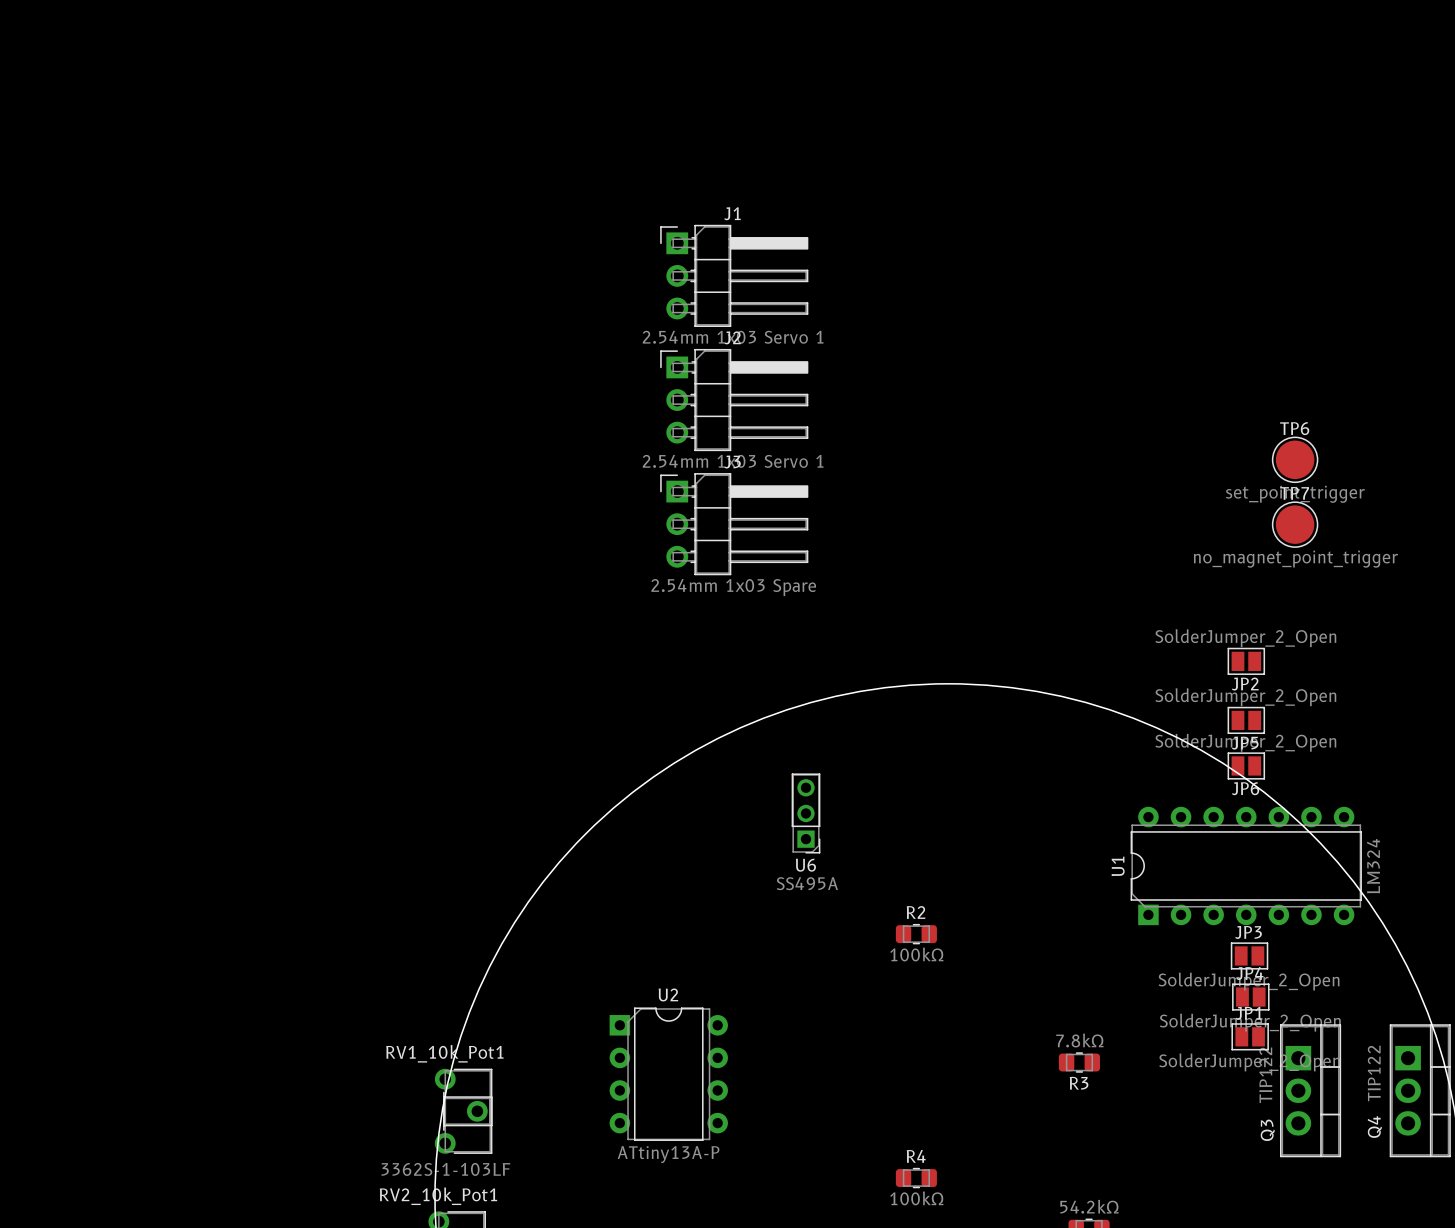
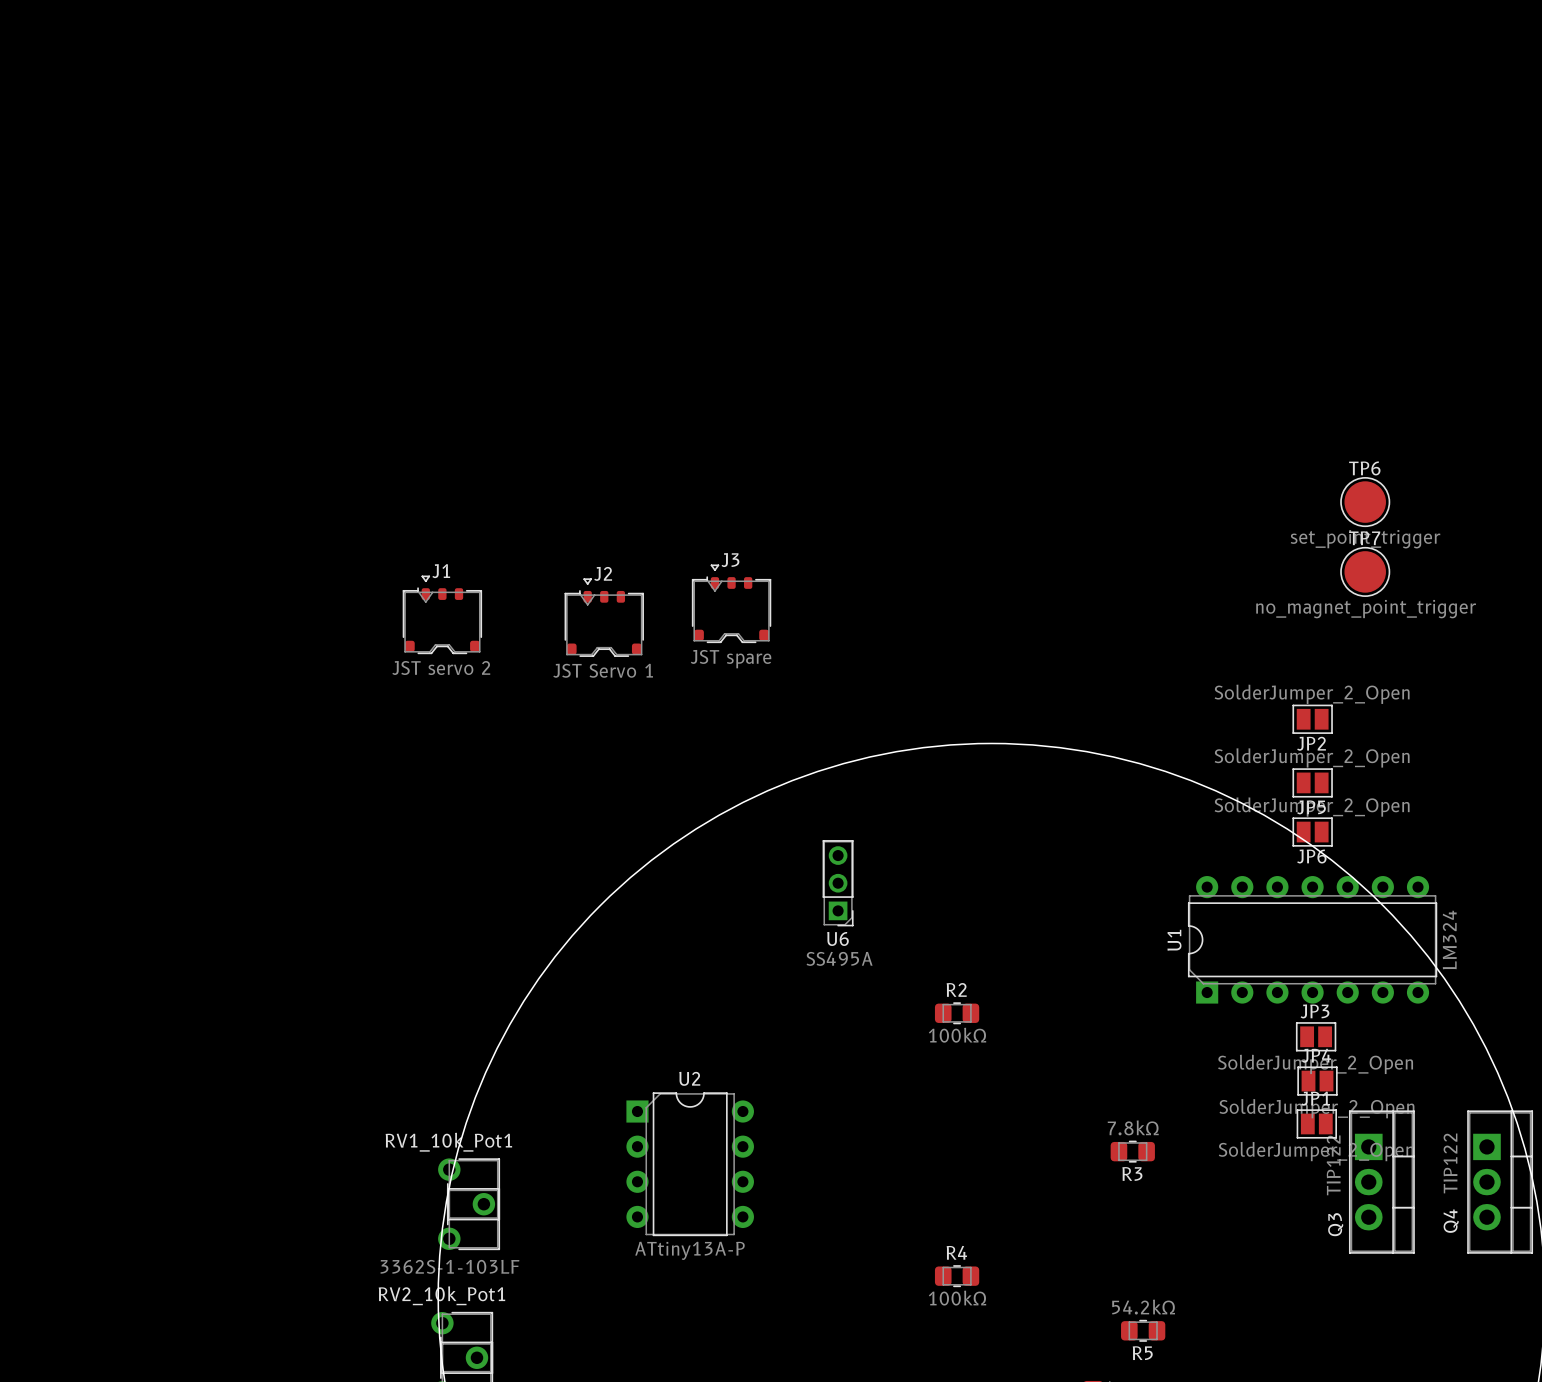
J1 footprint: [660, 224, 809, 328] -> [402, 575, 483, 655]
J1 value: 2.54mm 1x03 Servo 1 (733, 337) -> JST servo 2 (441, 668)
J2 footprint: [660, 348, 809, 452] -> [564, 578, 644, 657]
J2 value: 2.54mm 1x03 Servo 1 (733, 461) -> JST Servo 1 (603, 670)
J3 footprint: [660, 473, 809, 576] -> [691, 564, 772, 644]
J3 value: 2.54mm 1x03 Spare (733, 587) -> JST spare (731, 659)

